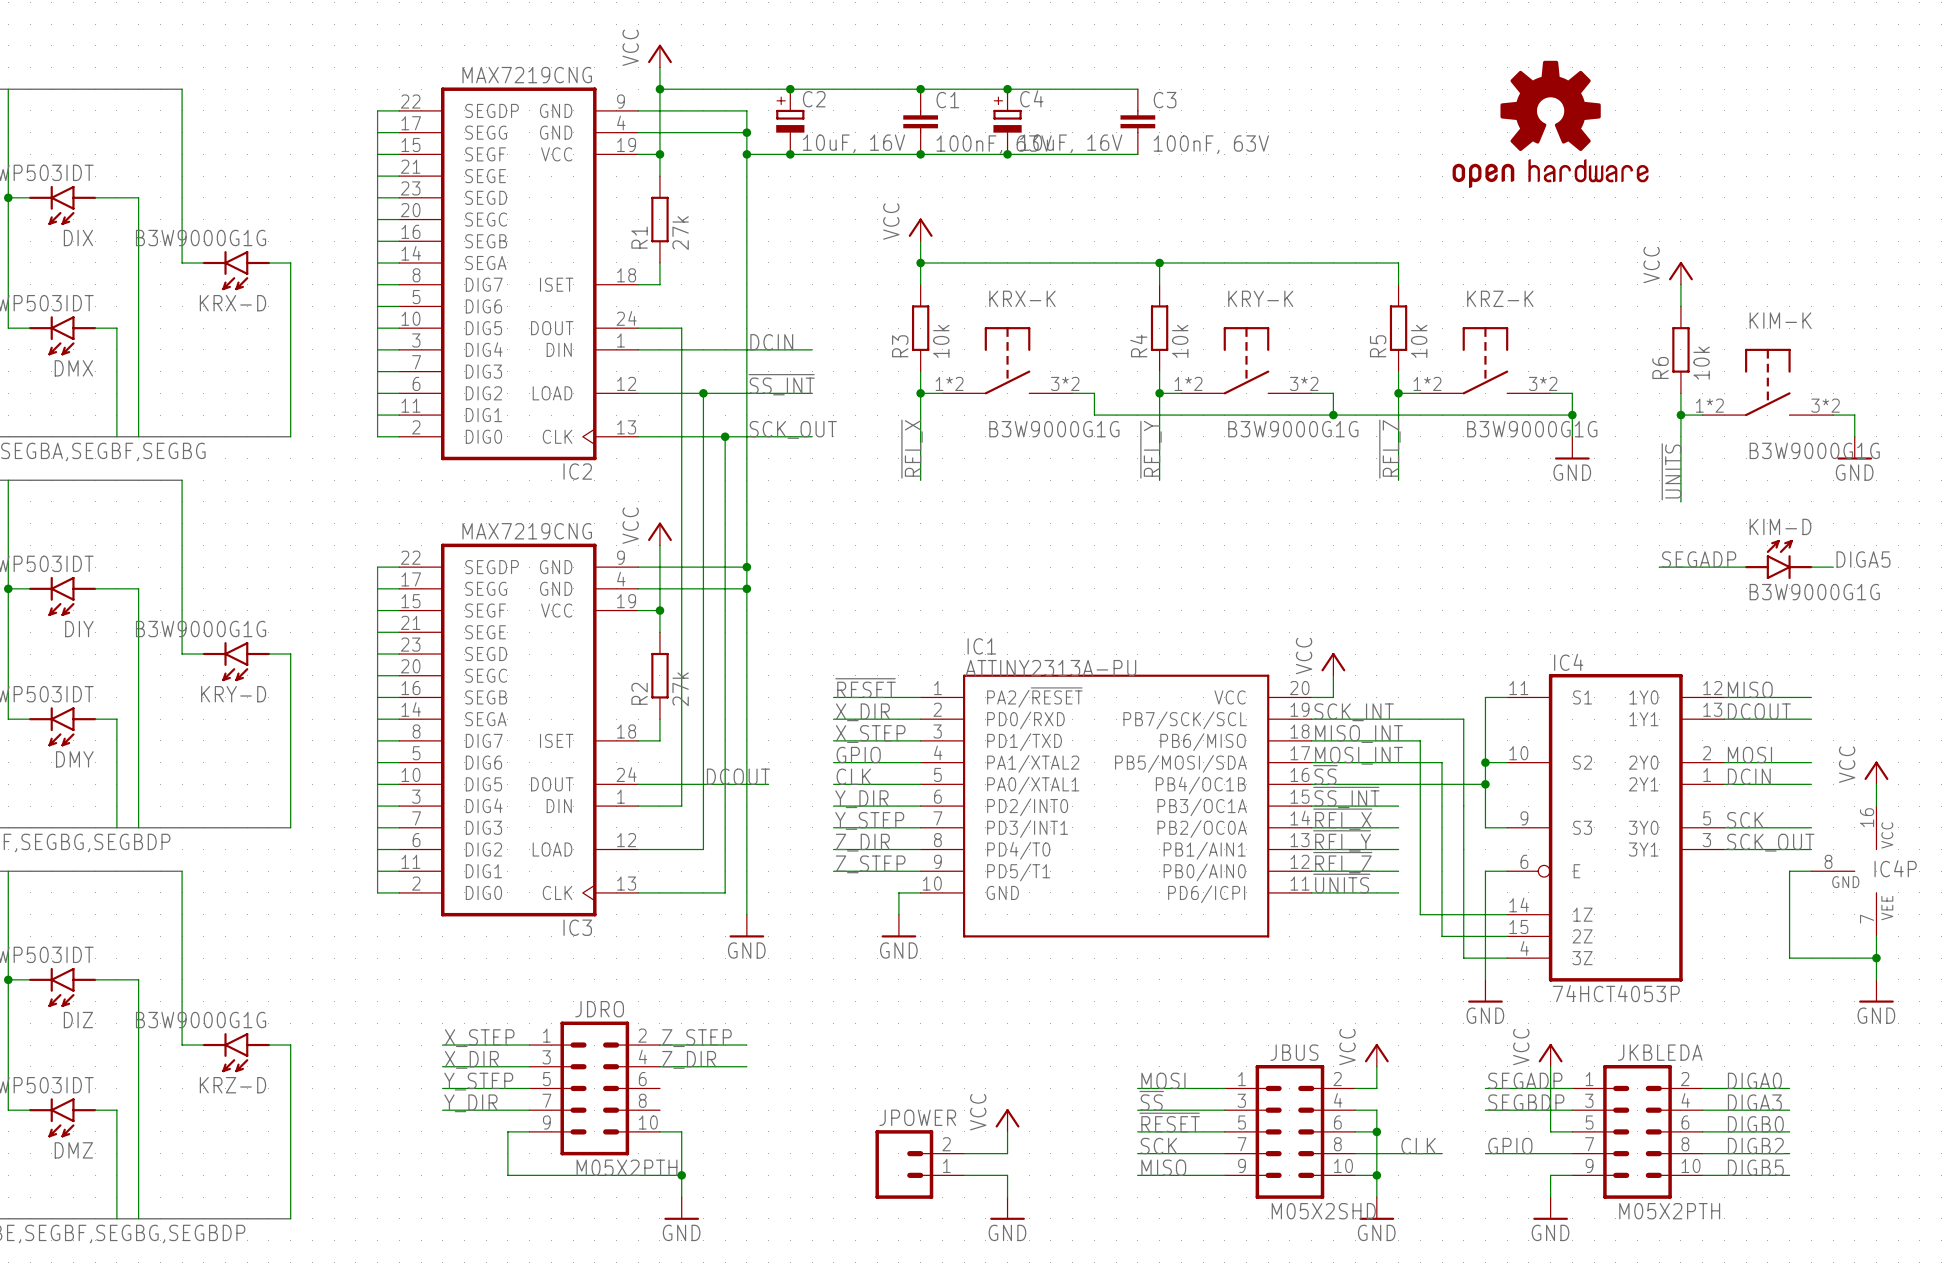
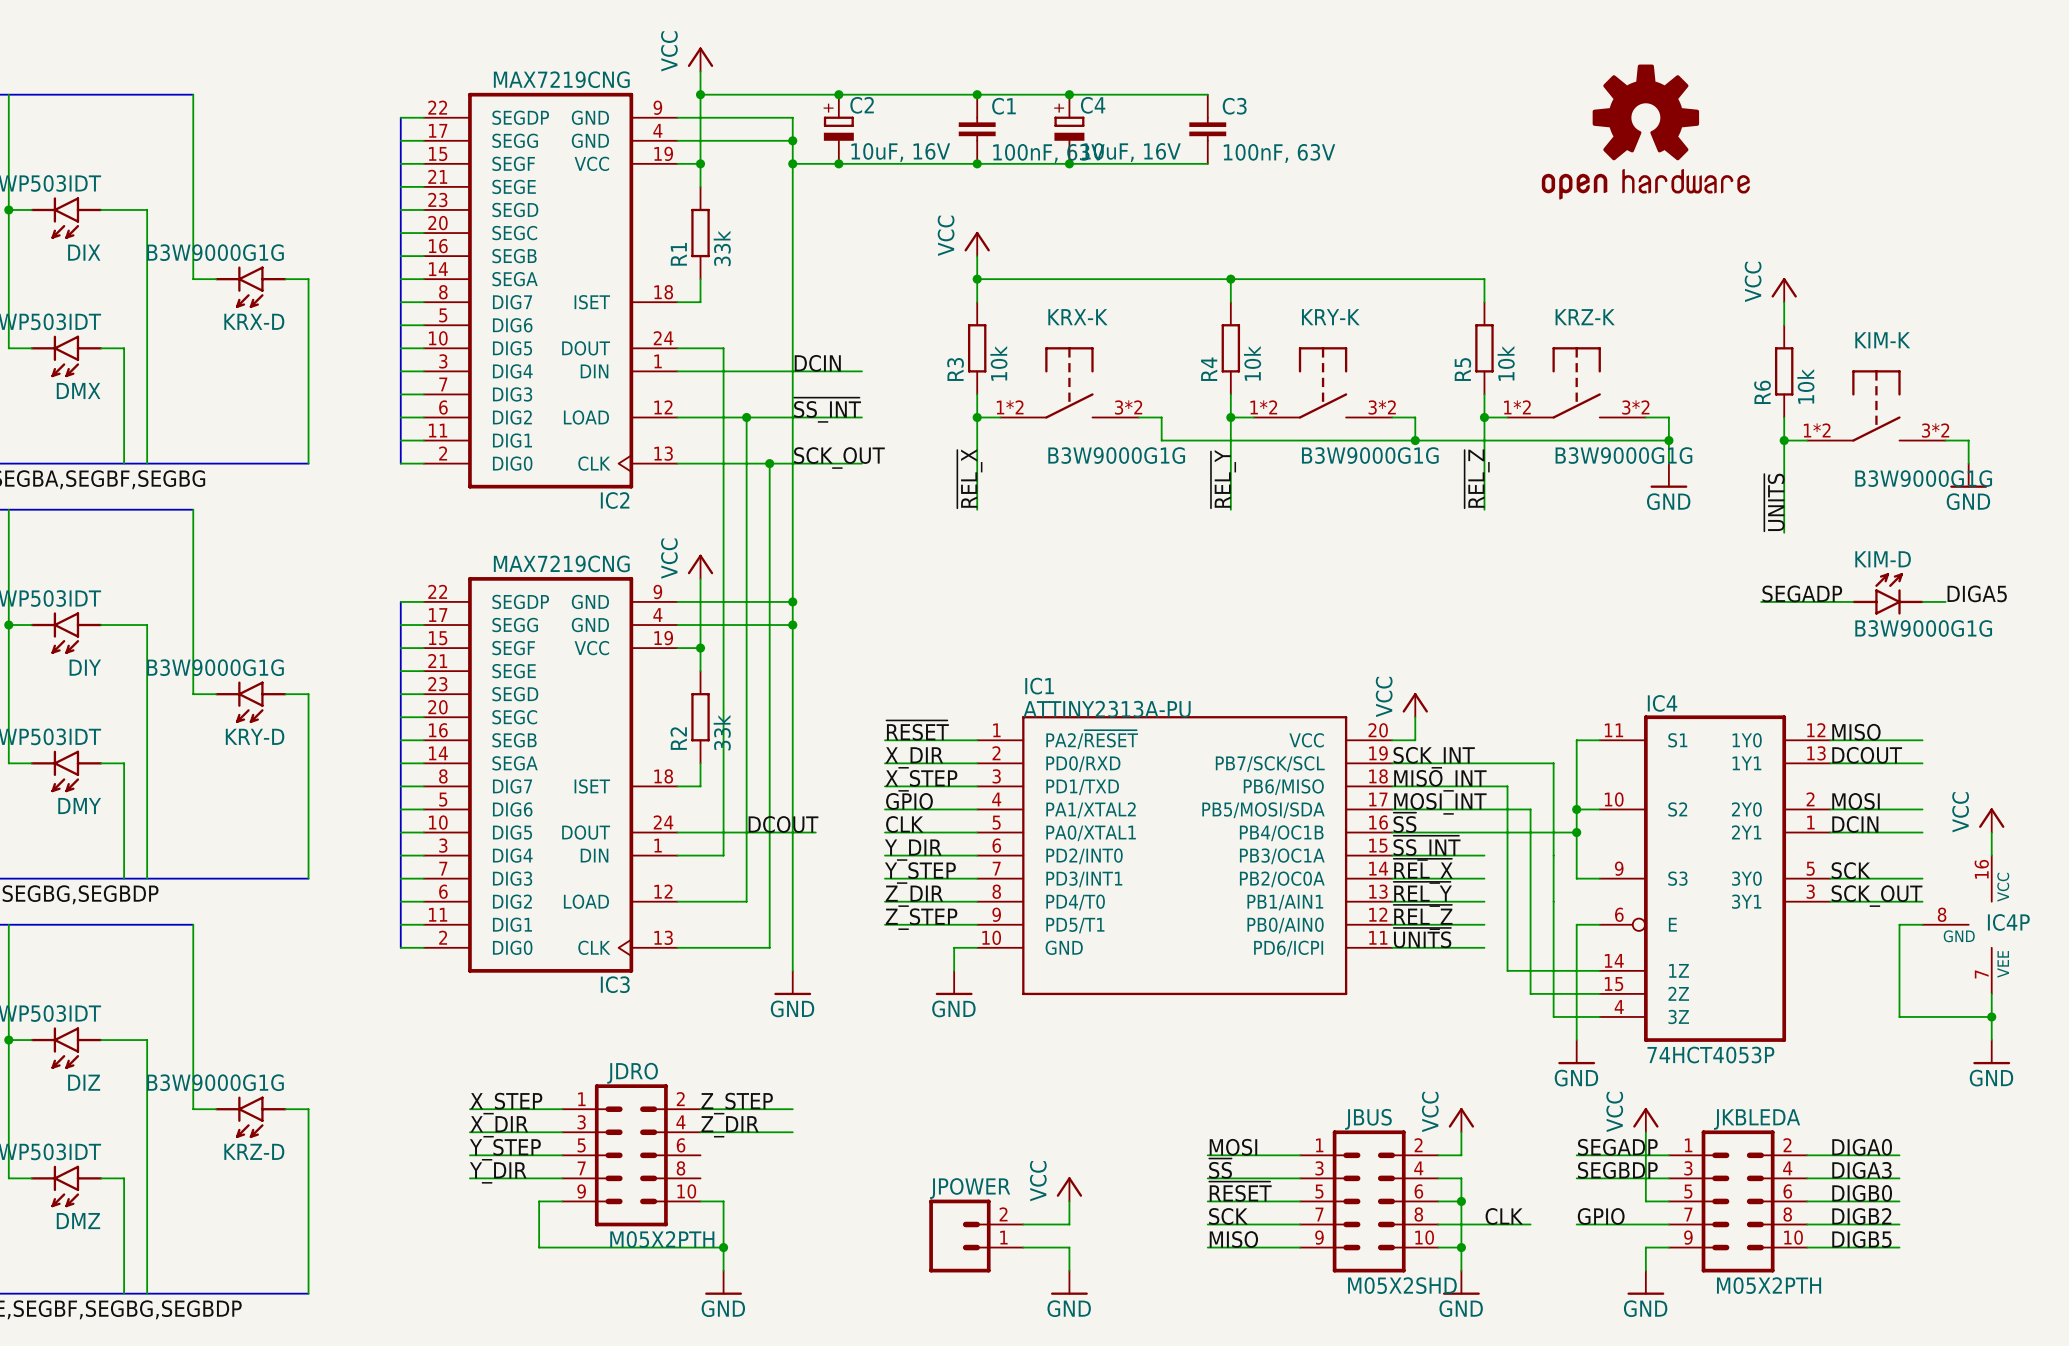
R1 value: 27k (680, 233) -> 33k (722, 248)
R2 value: 27k (680, 689) -> 33k (722, 732)

